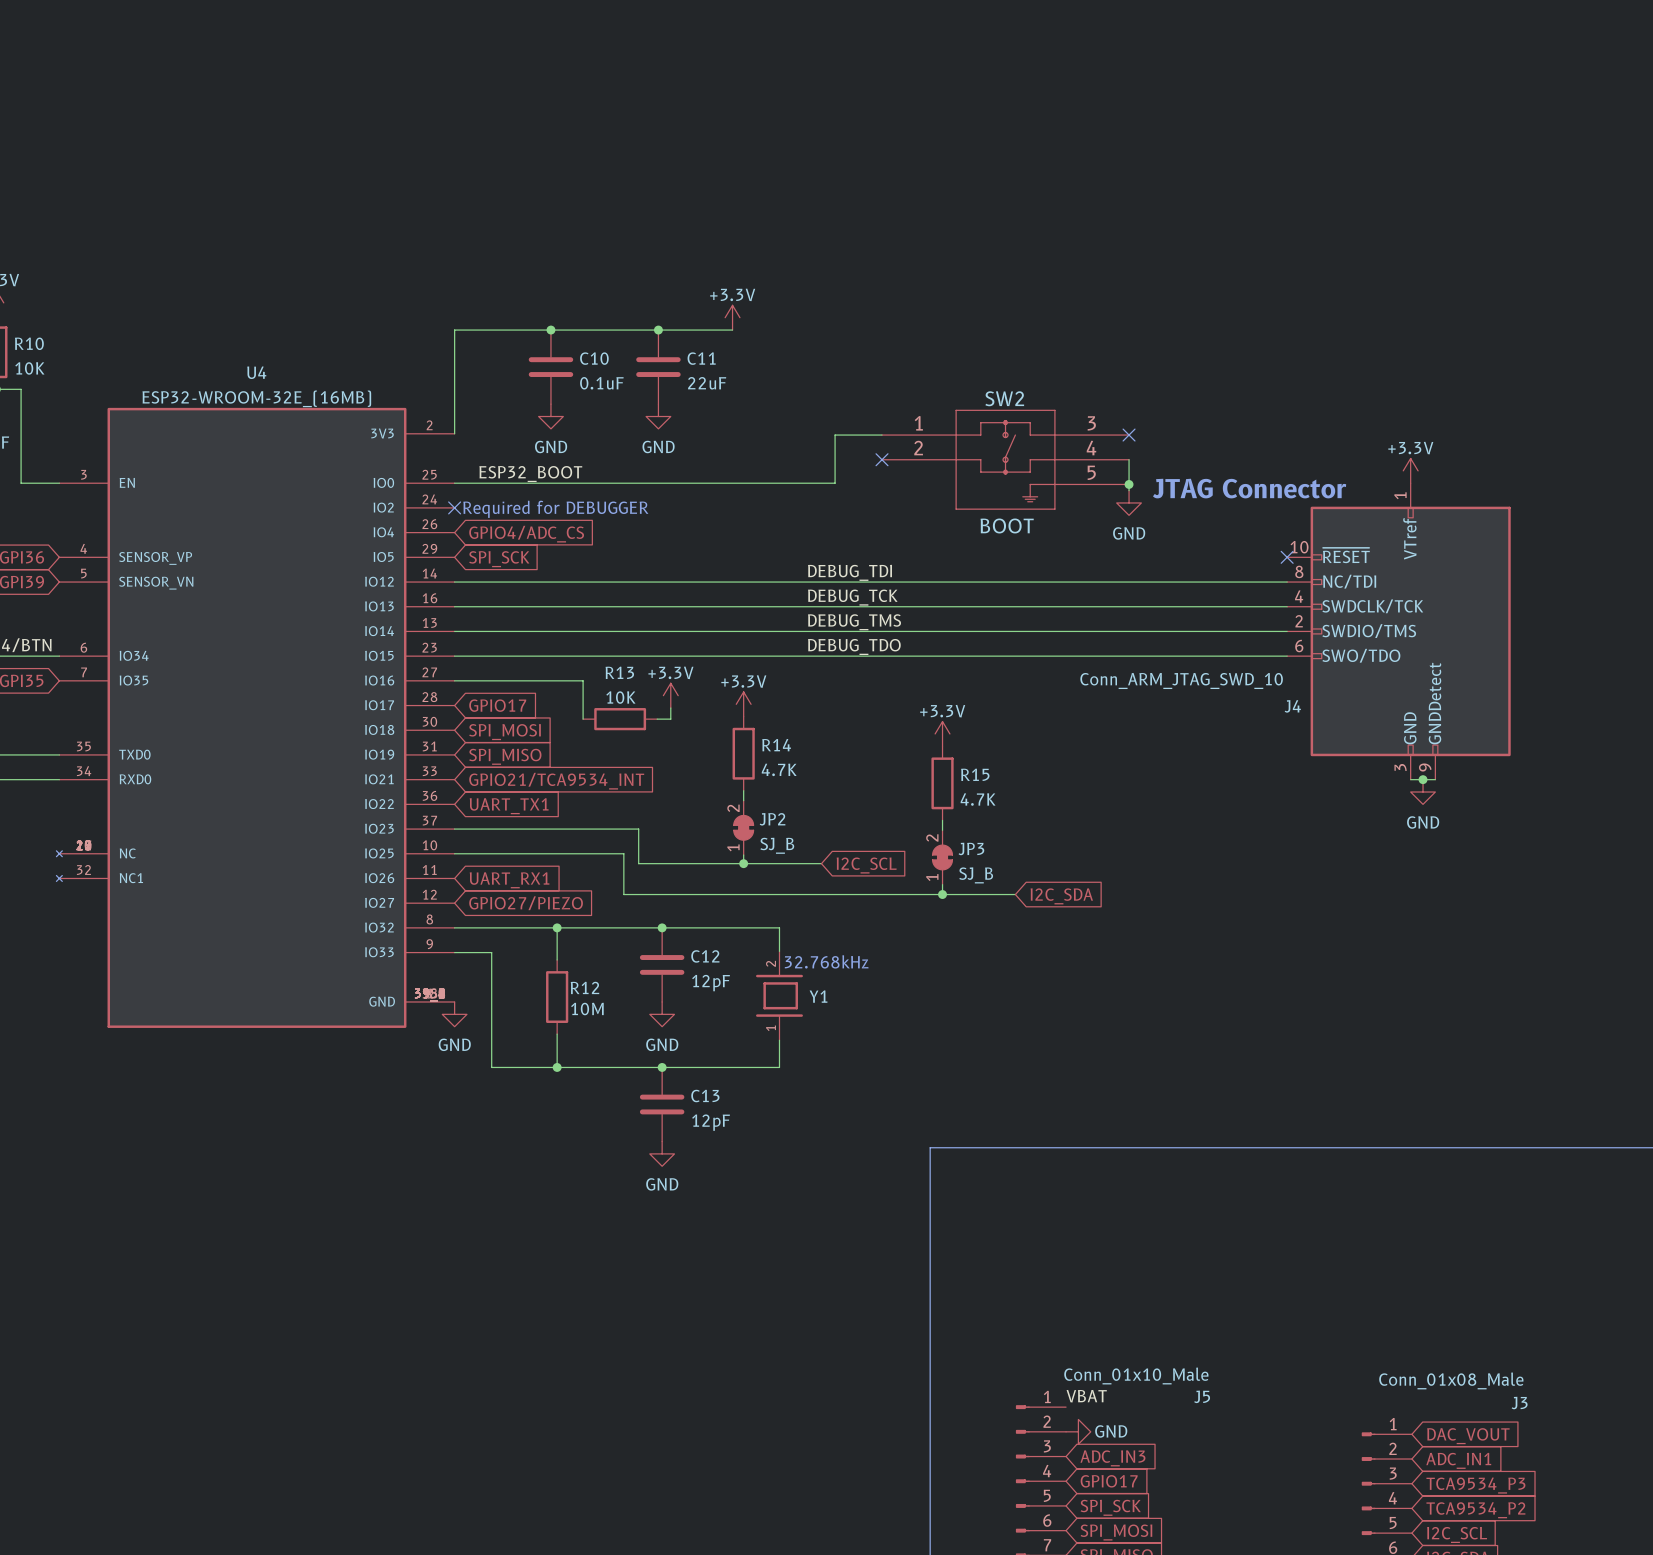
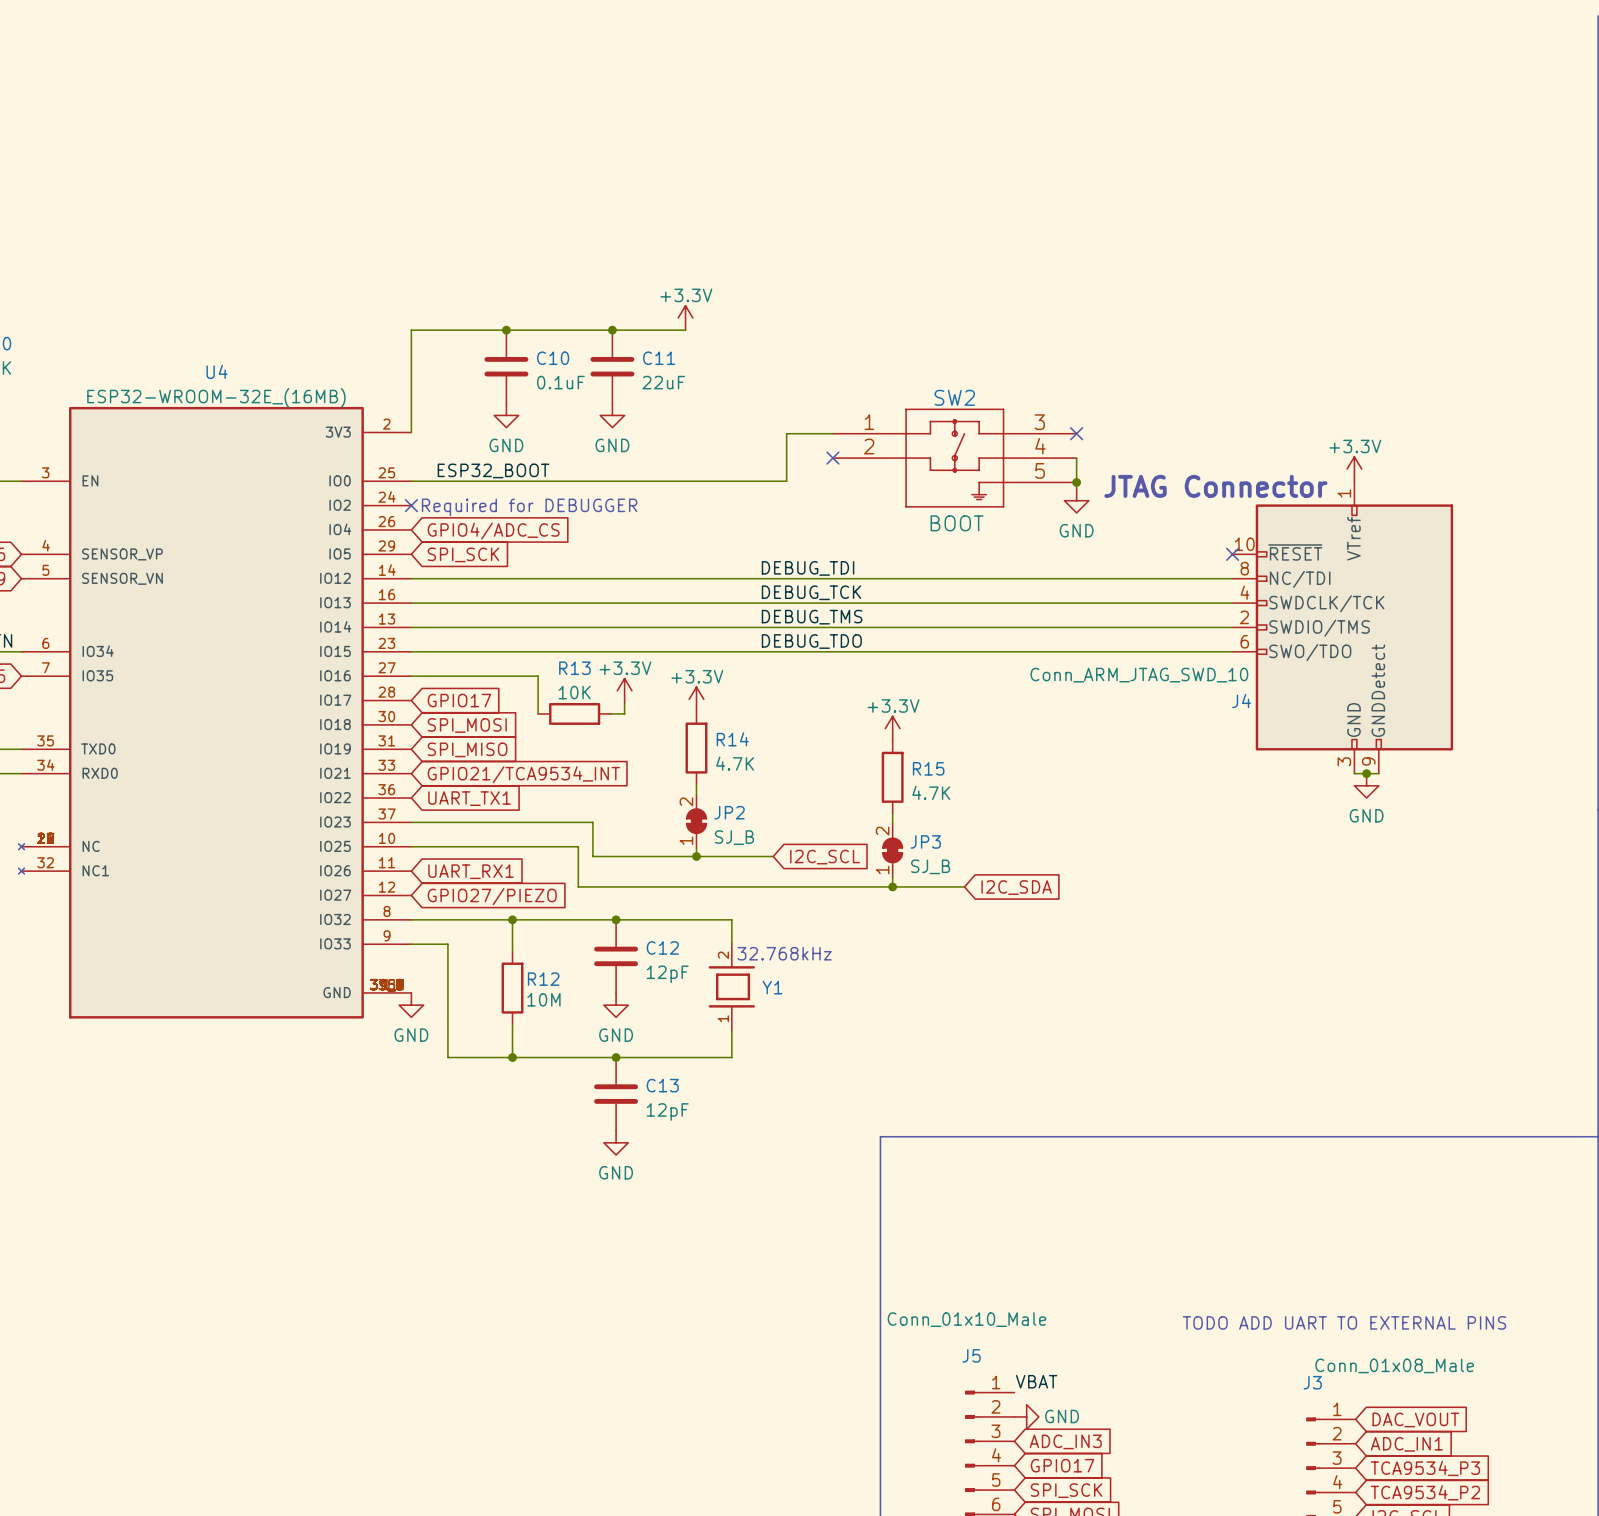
text: none -> TODO ADD UART TO EXTERNAL PINS (1344, 1322)
J5 value position: Conn_01x10_Male (1136, 1376) -> Conn_01x10_Male (966, 1319)
J5 name position: J5 (1202, 1396) -> J5 (971, 1355)
J3 name position: J3 (1519, 1403) -> J3 (1312, 1382)

